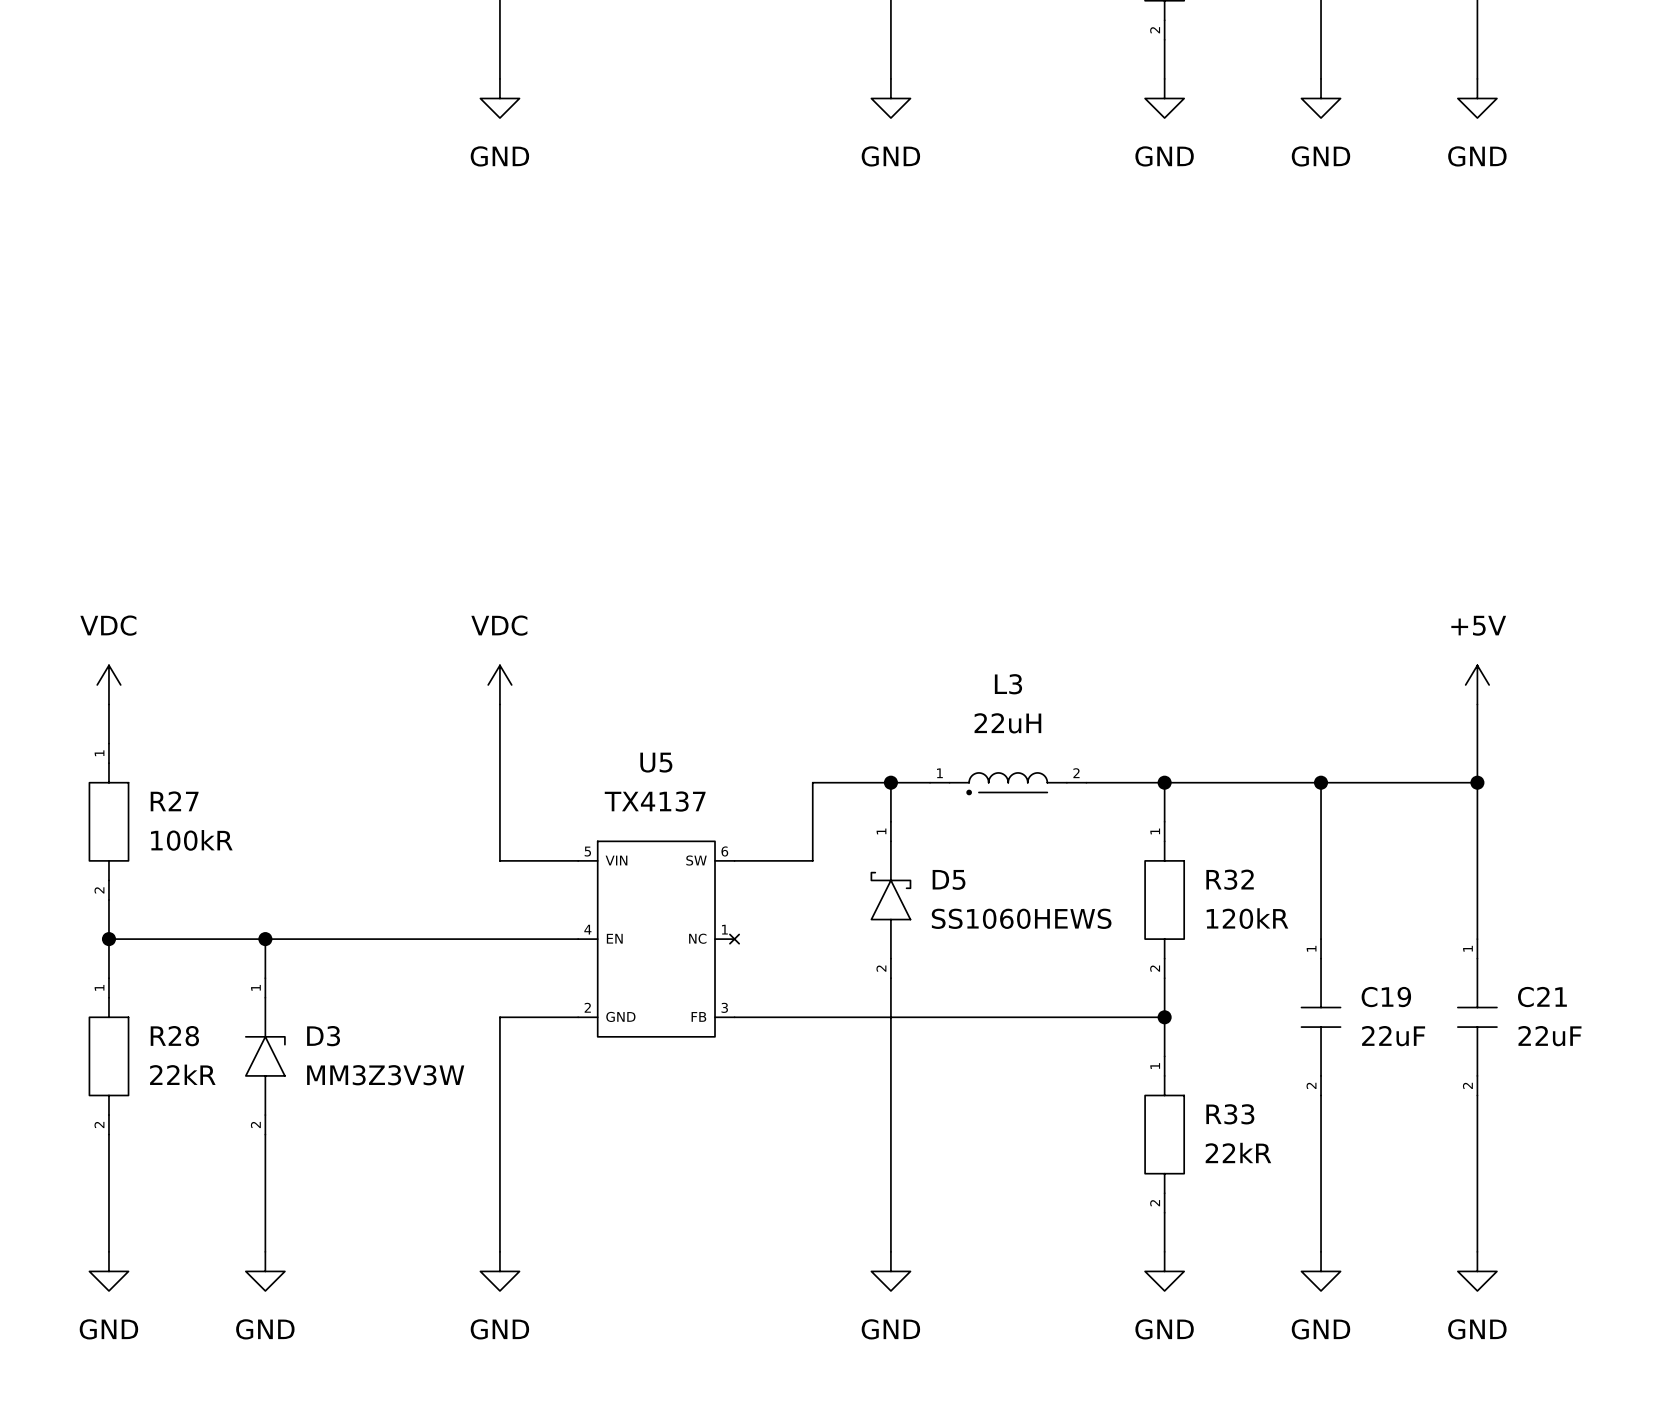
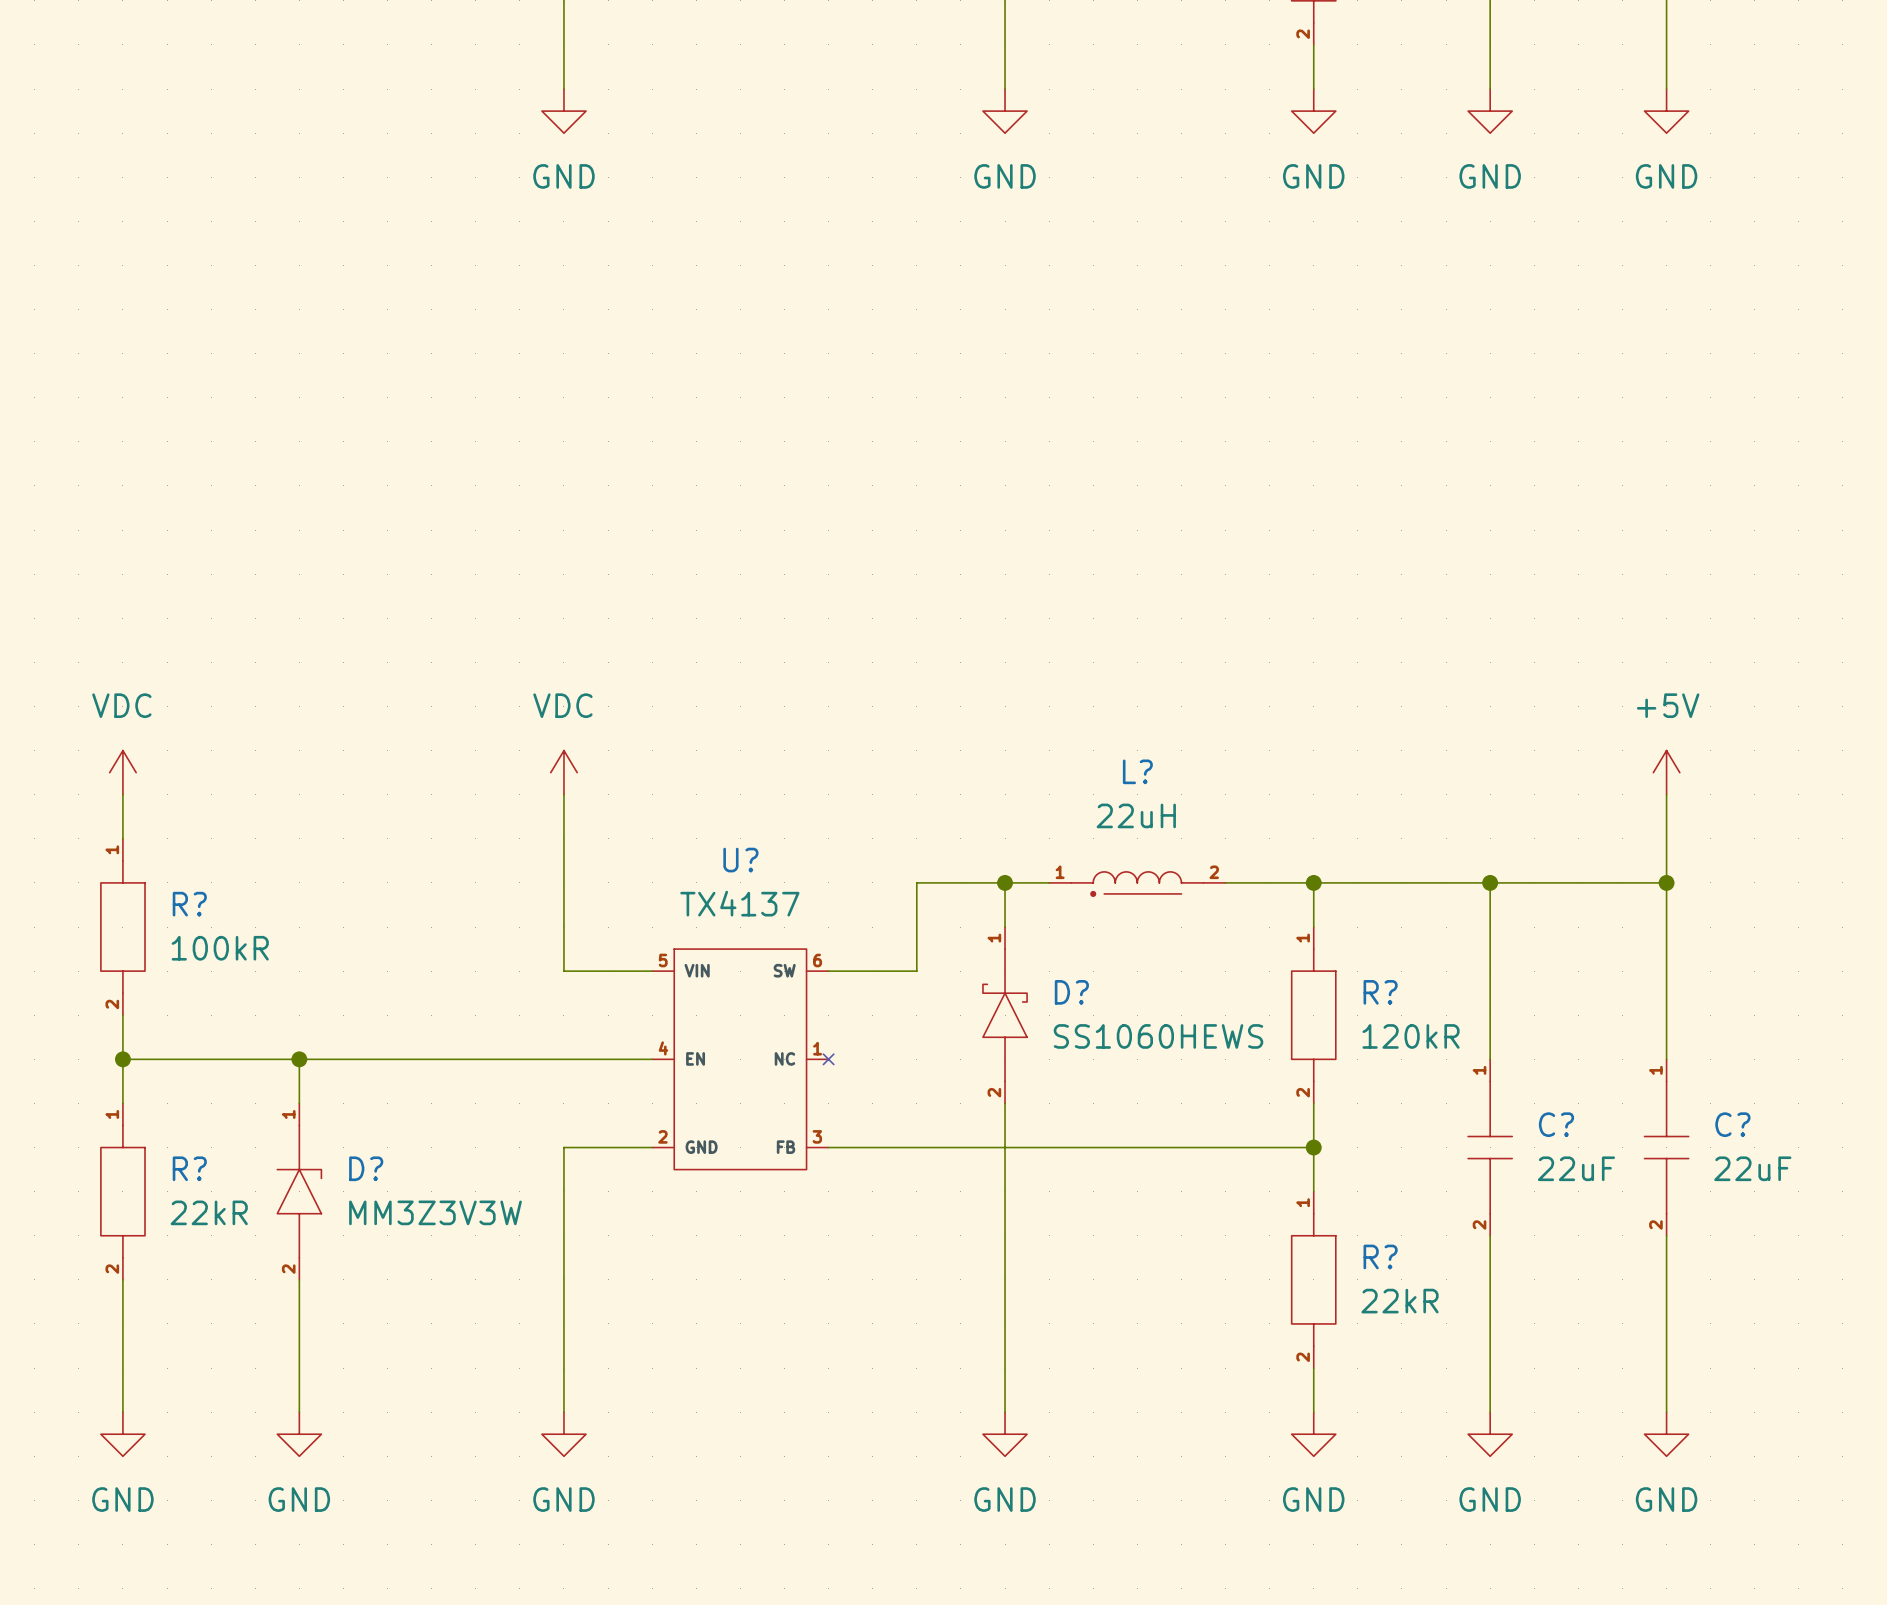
L3 name: L3 (1008, 684) -> L? (1137, 771)
U5 name: U5 (656, 762) -> U? (740, 860)
R27 name: R27 (174, 801) -> R? (189, 904)
D5 name: D5 (949, 879) -> D? (1071, 992)
R32 name: R32 (1230, 879) -> R? (1380, 992)
C19 name: C19 (1386, 997) -> C? (1556, 1124)
C21 name: C21 (1542, 997) -> C? (1732, 1124)
R28 name: R28 (174, 1036) -> R? (189, 1168)
D3 name: D3 (323, 1036) -> D? (366, 1168)
R33 name: R33 (1230, 1114) -> R? (1380, 1256)

